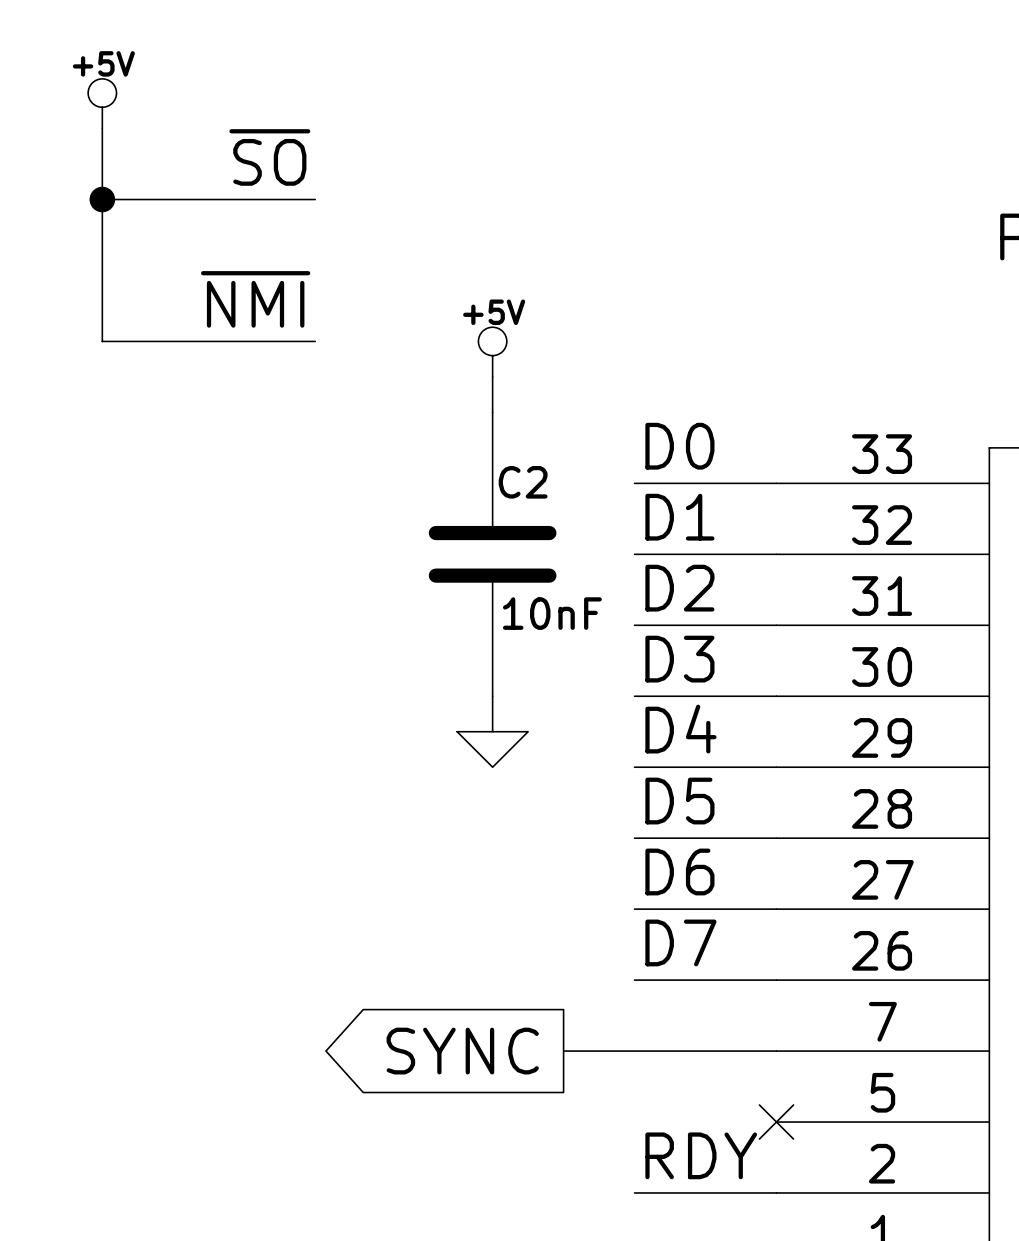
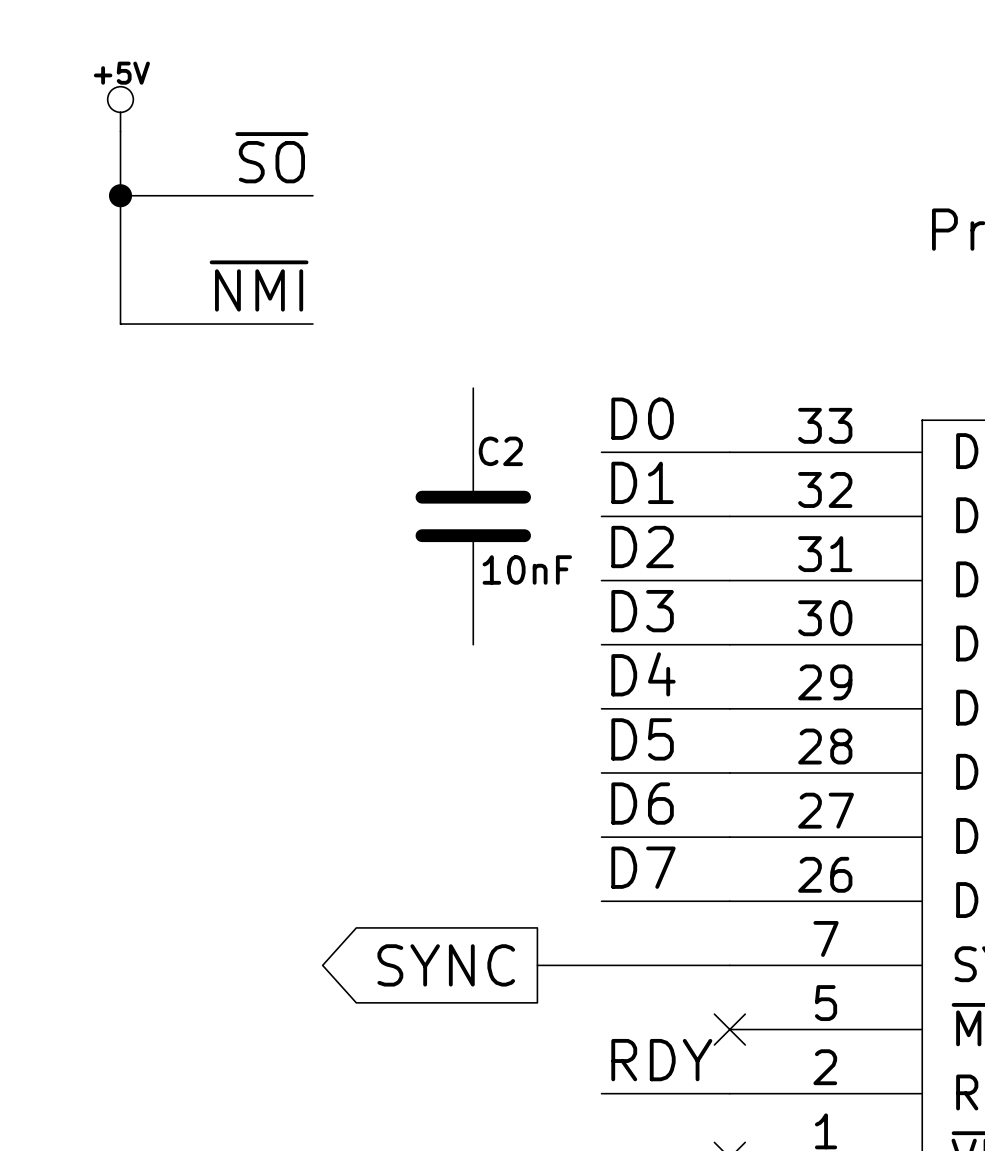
power symbol: +5V (492, 352) -> none
wire: (492, 376) (492, 412) -> none
wire: (492, 696) (492, 731) -> none
power symbol: (492, 749) -> none

